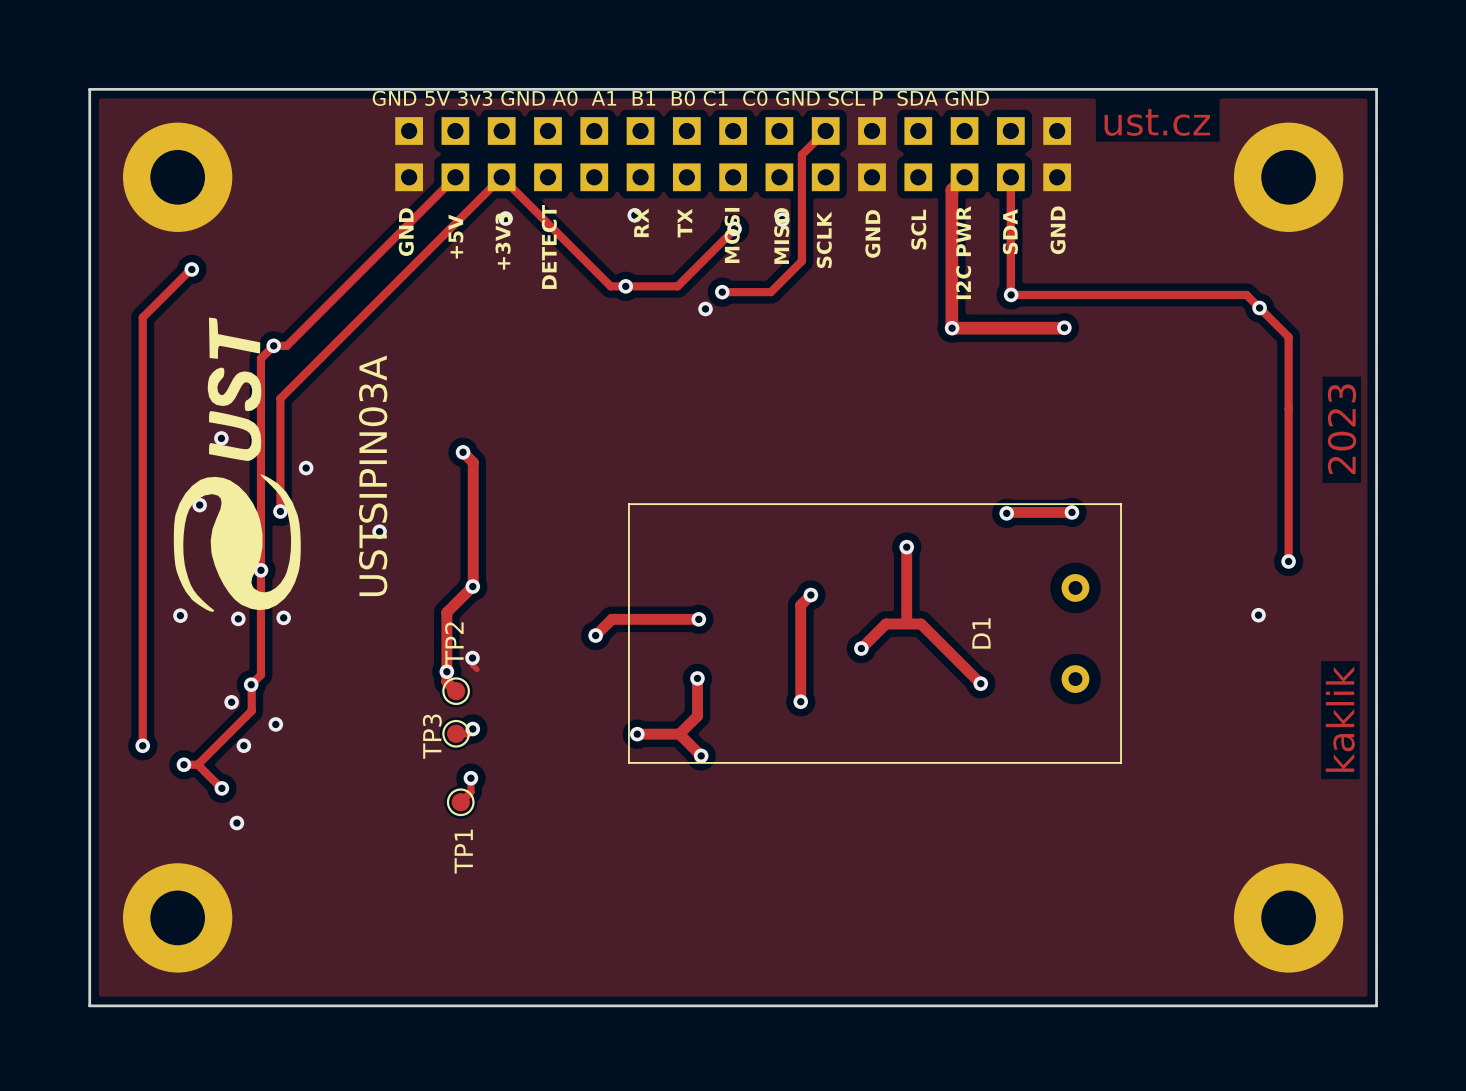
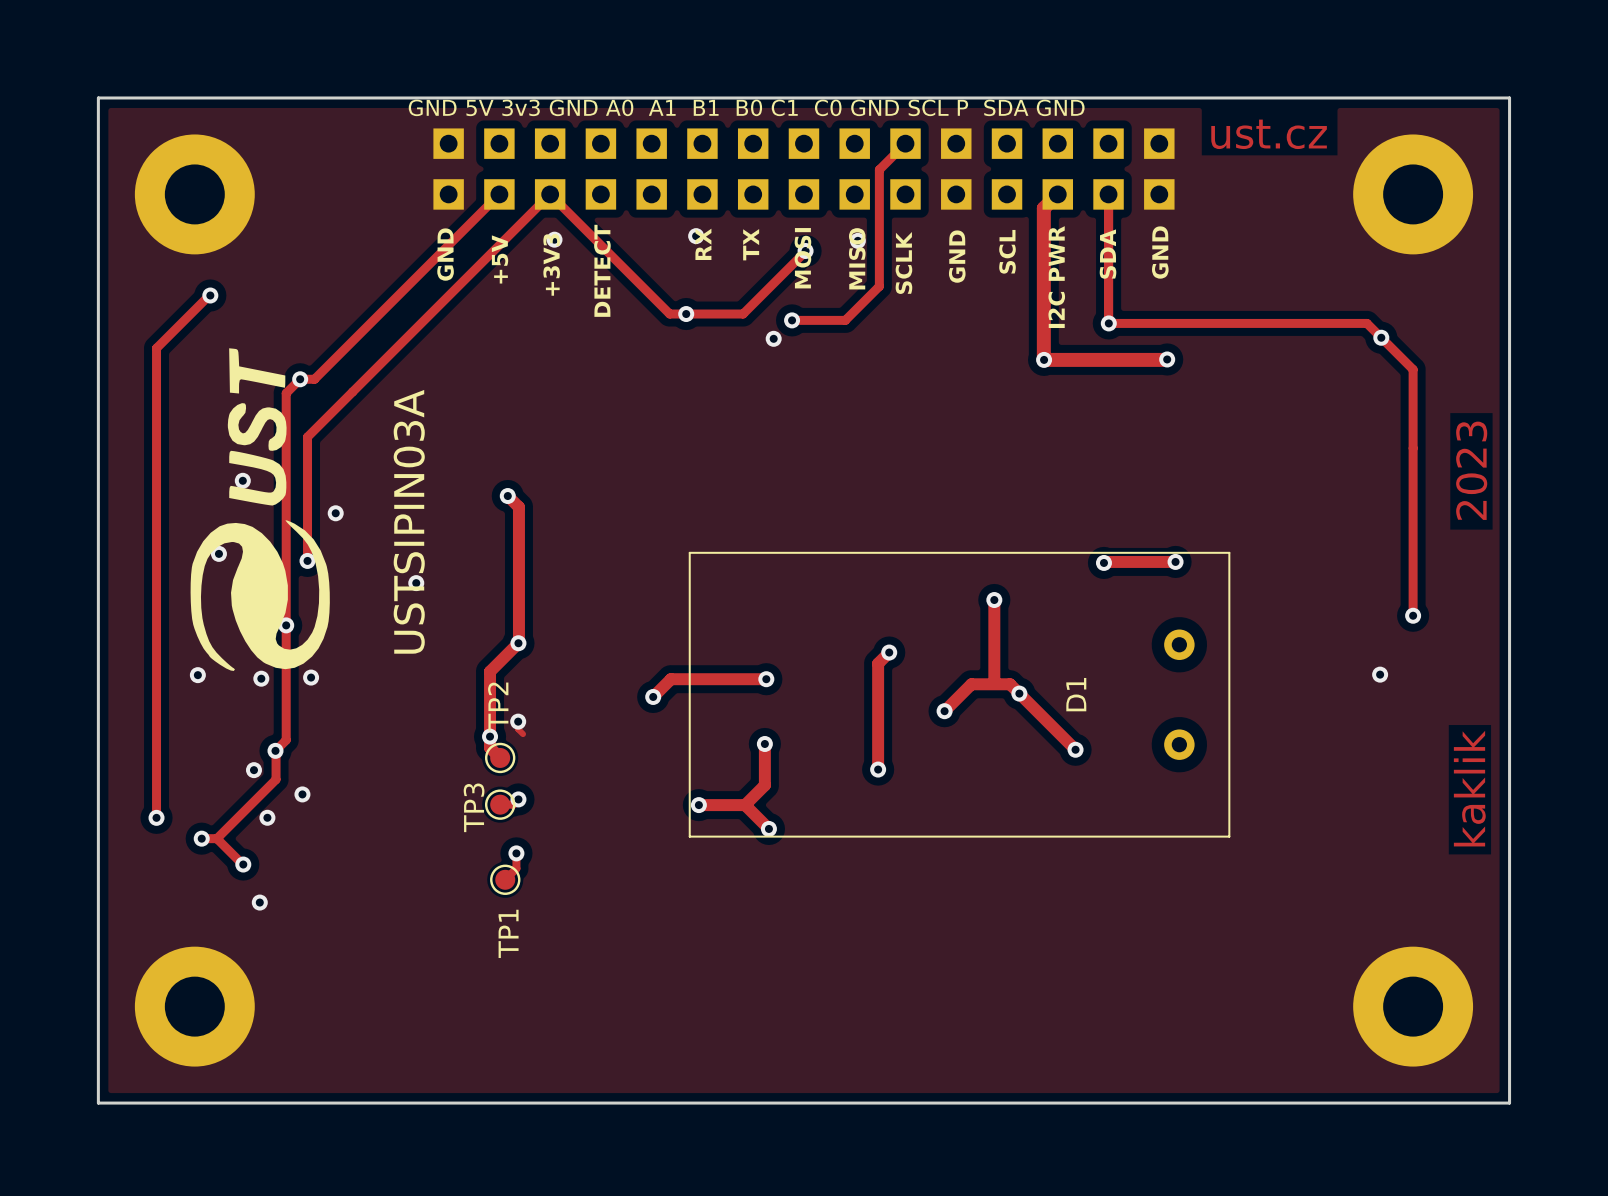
via: none -> (1019, 693)

